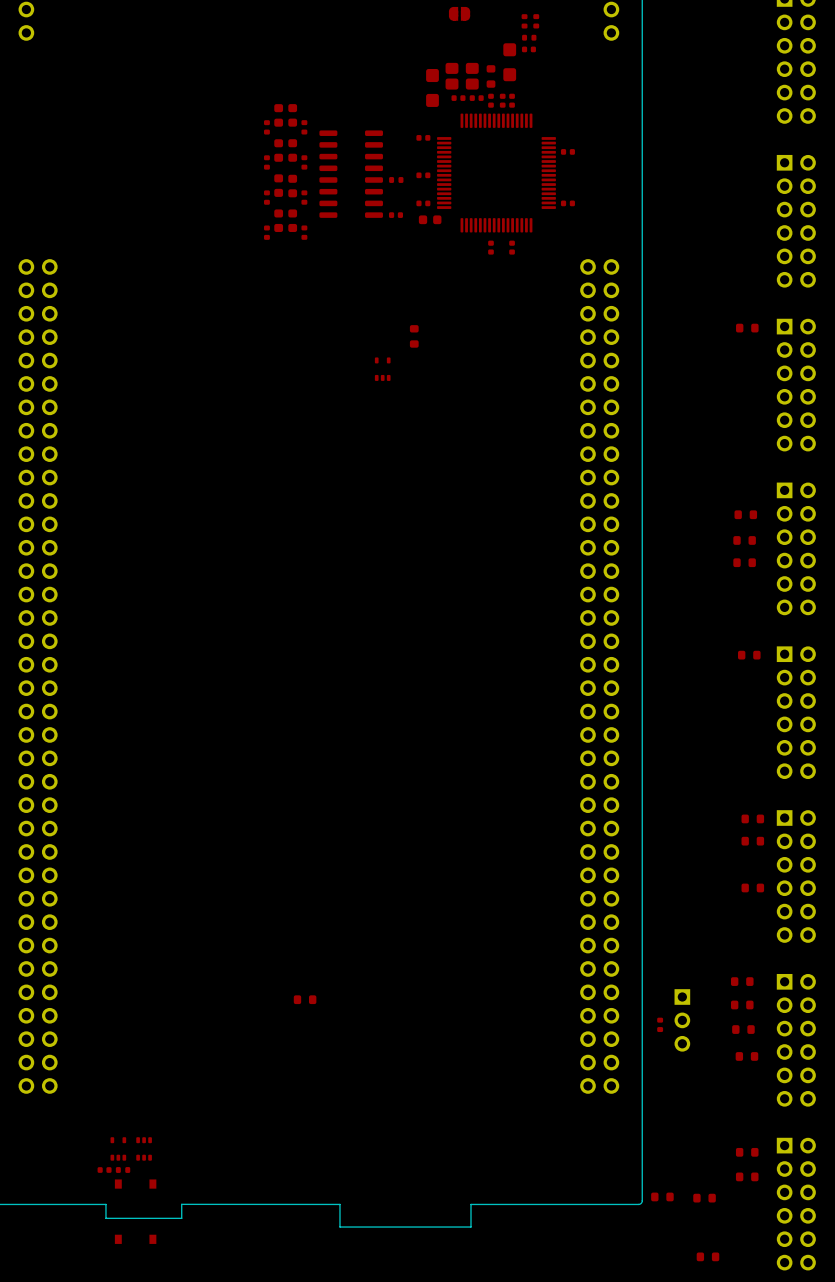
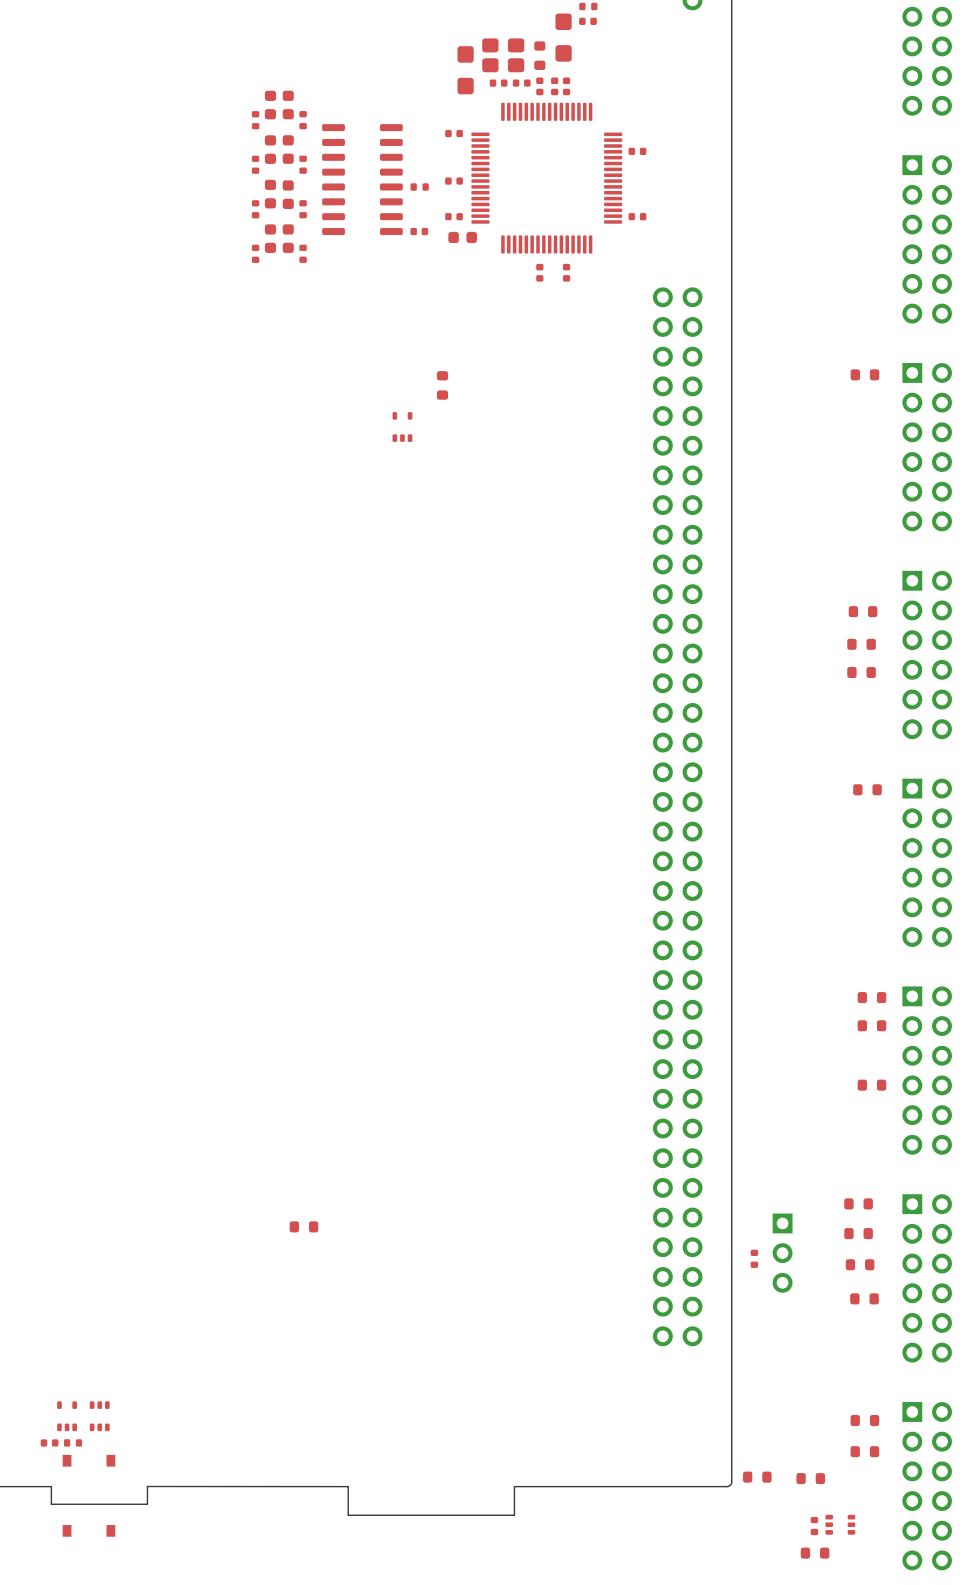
part: none -> (840, 1524)
part: none -> (814, 1526)

